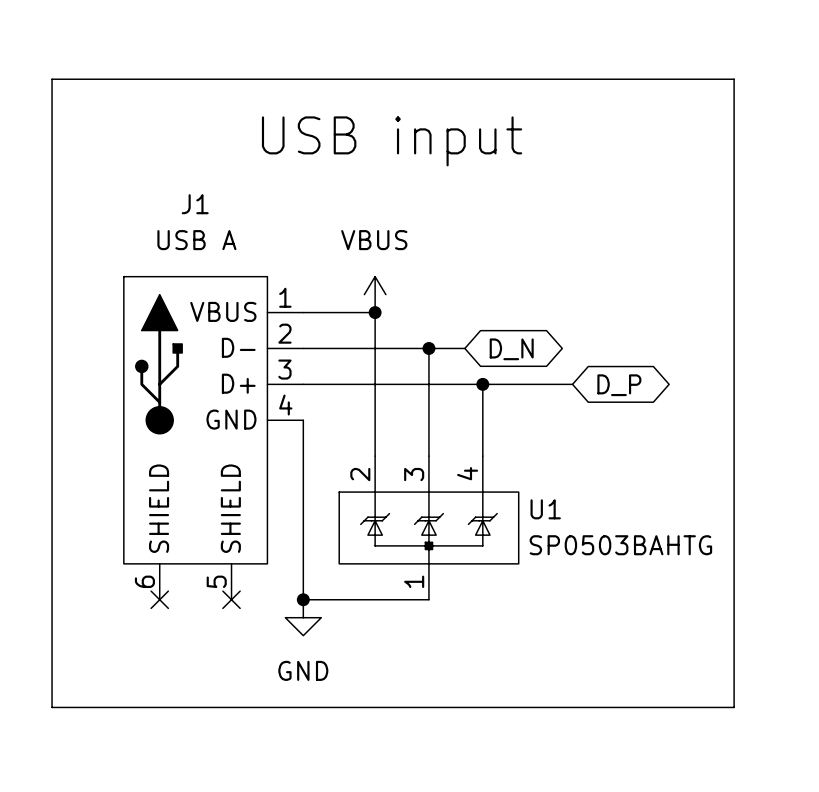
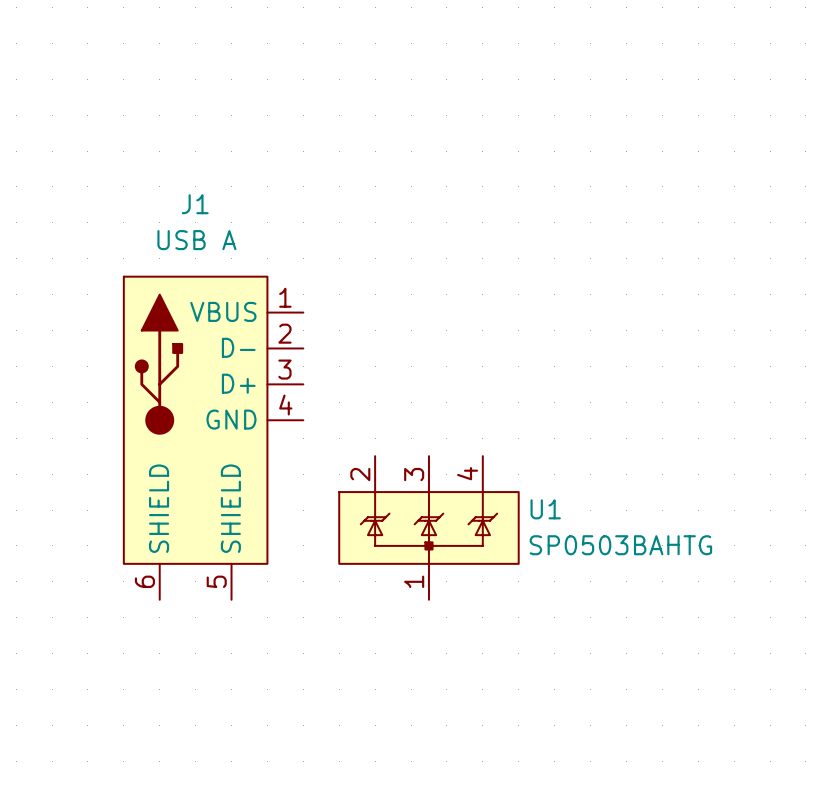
line: (52, 79) (734, 79) (734, 707) (52, 707) (52, 79) -> none
text: USB input (392, 141) -> none
power symbol: VBUS (375, 294) -> none
wire: (303, 312) (375, 312) (375, 456) -> none
junction: (375, 312) -> none
wire: (303, 348) (464, 348) -> none
wire: (428, 348) (428, 456) -> none
junction: (428, 348) -> none
global label: D_N (511, 349) -> none
wire: (303, 384) (572, 384) -> none
wire: (482, 384) (482, 456) -> none
junction: (482, 384) -> none
global label: D_P (619, 385) -> none
wire: (303, 420) (303, 599) (428, 599) -> none
no-connect mark: (159, 599) -> none
no-connect mark: (231, 599) -> none
junction: (303, 599) -> none
power symbol: GND (303, 617) -> none

